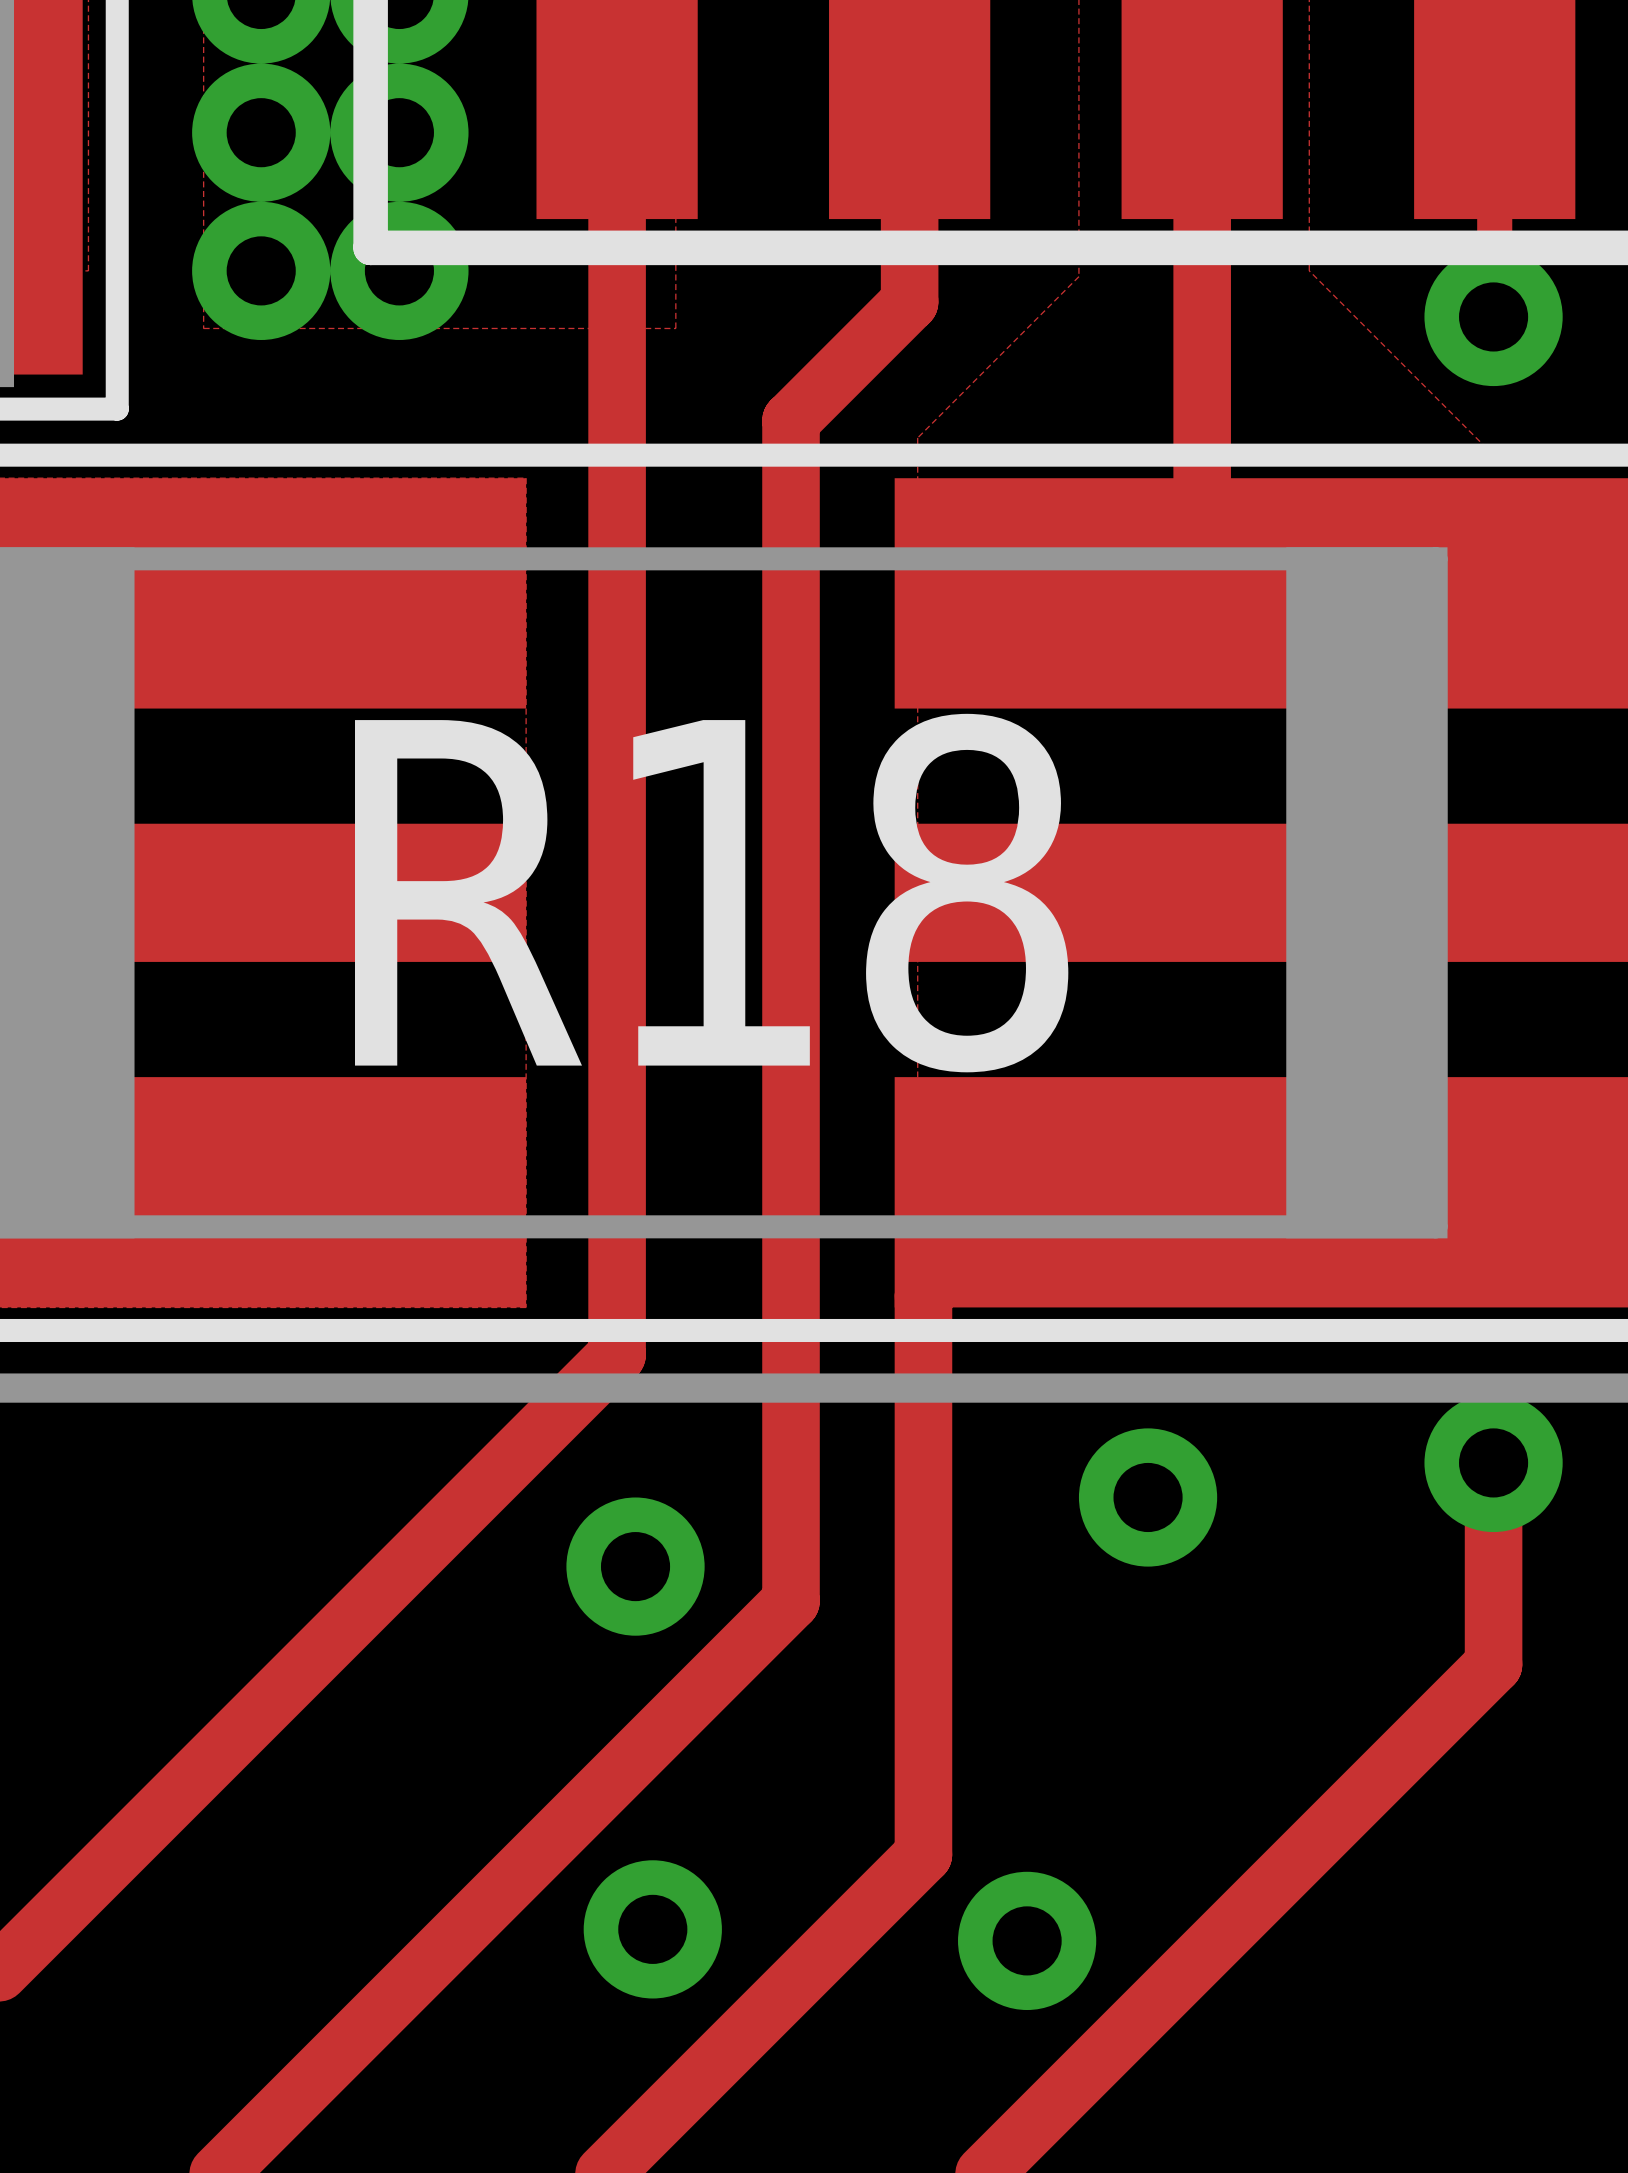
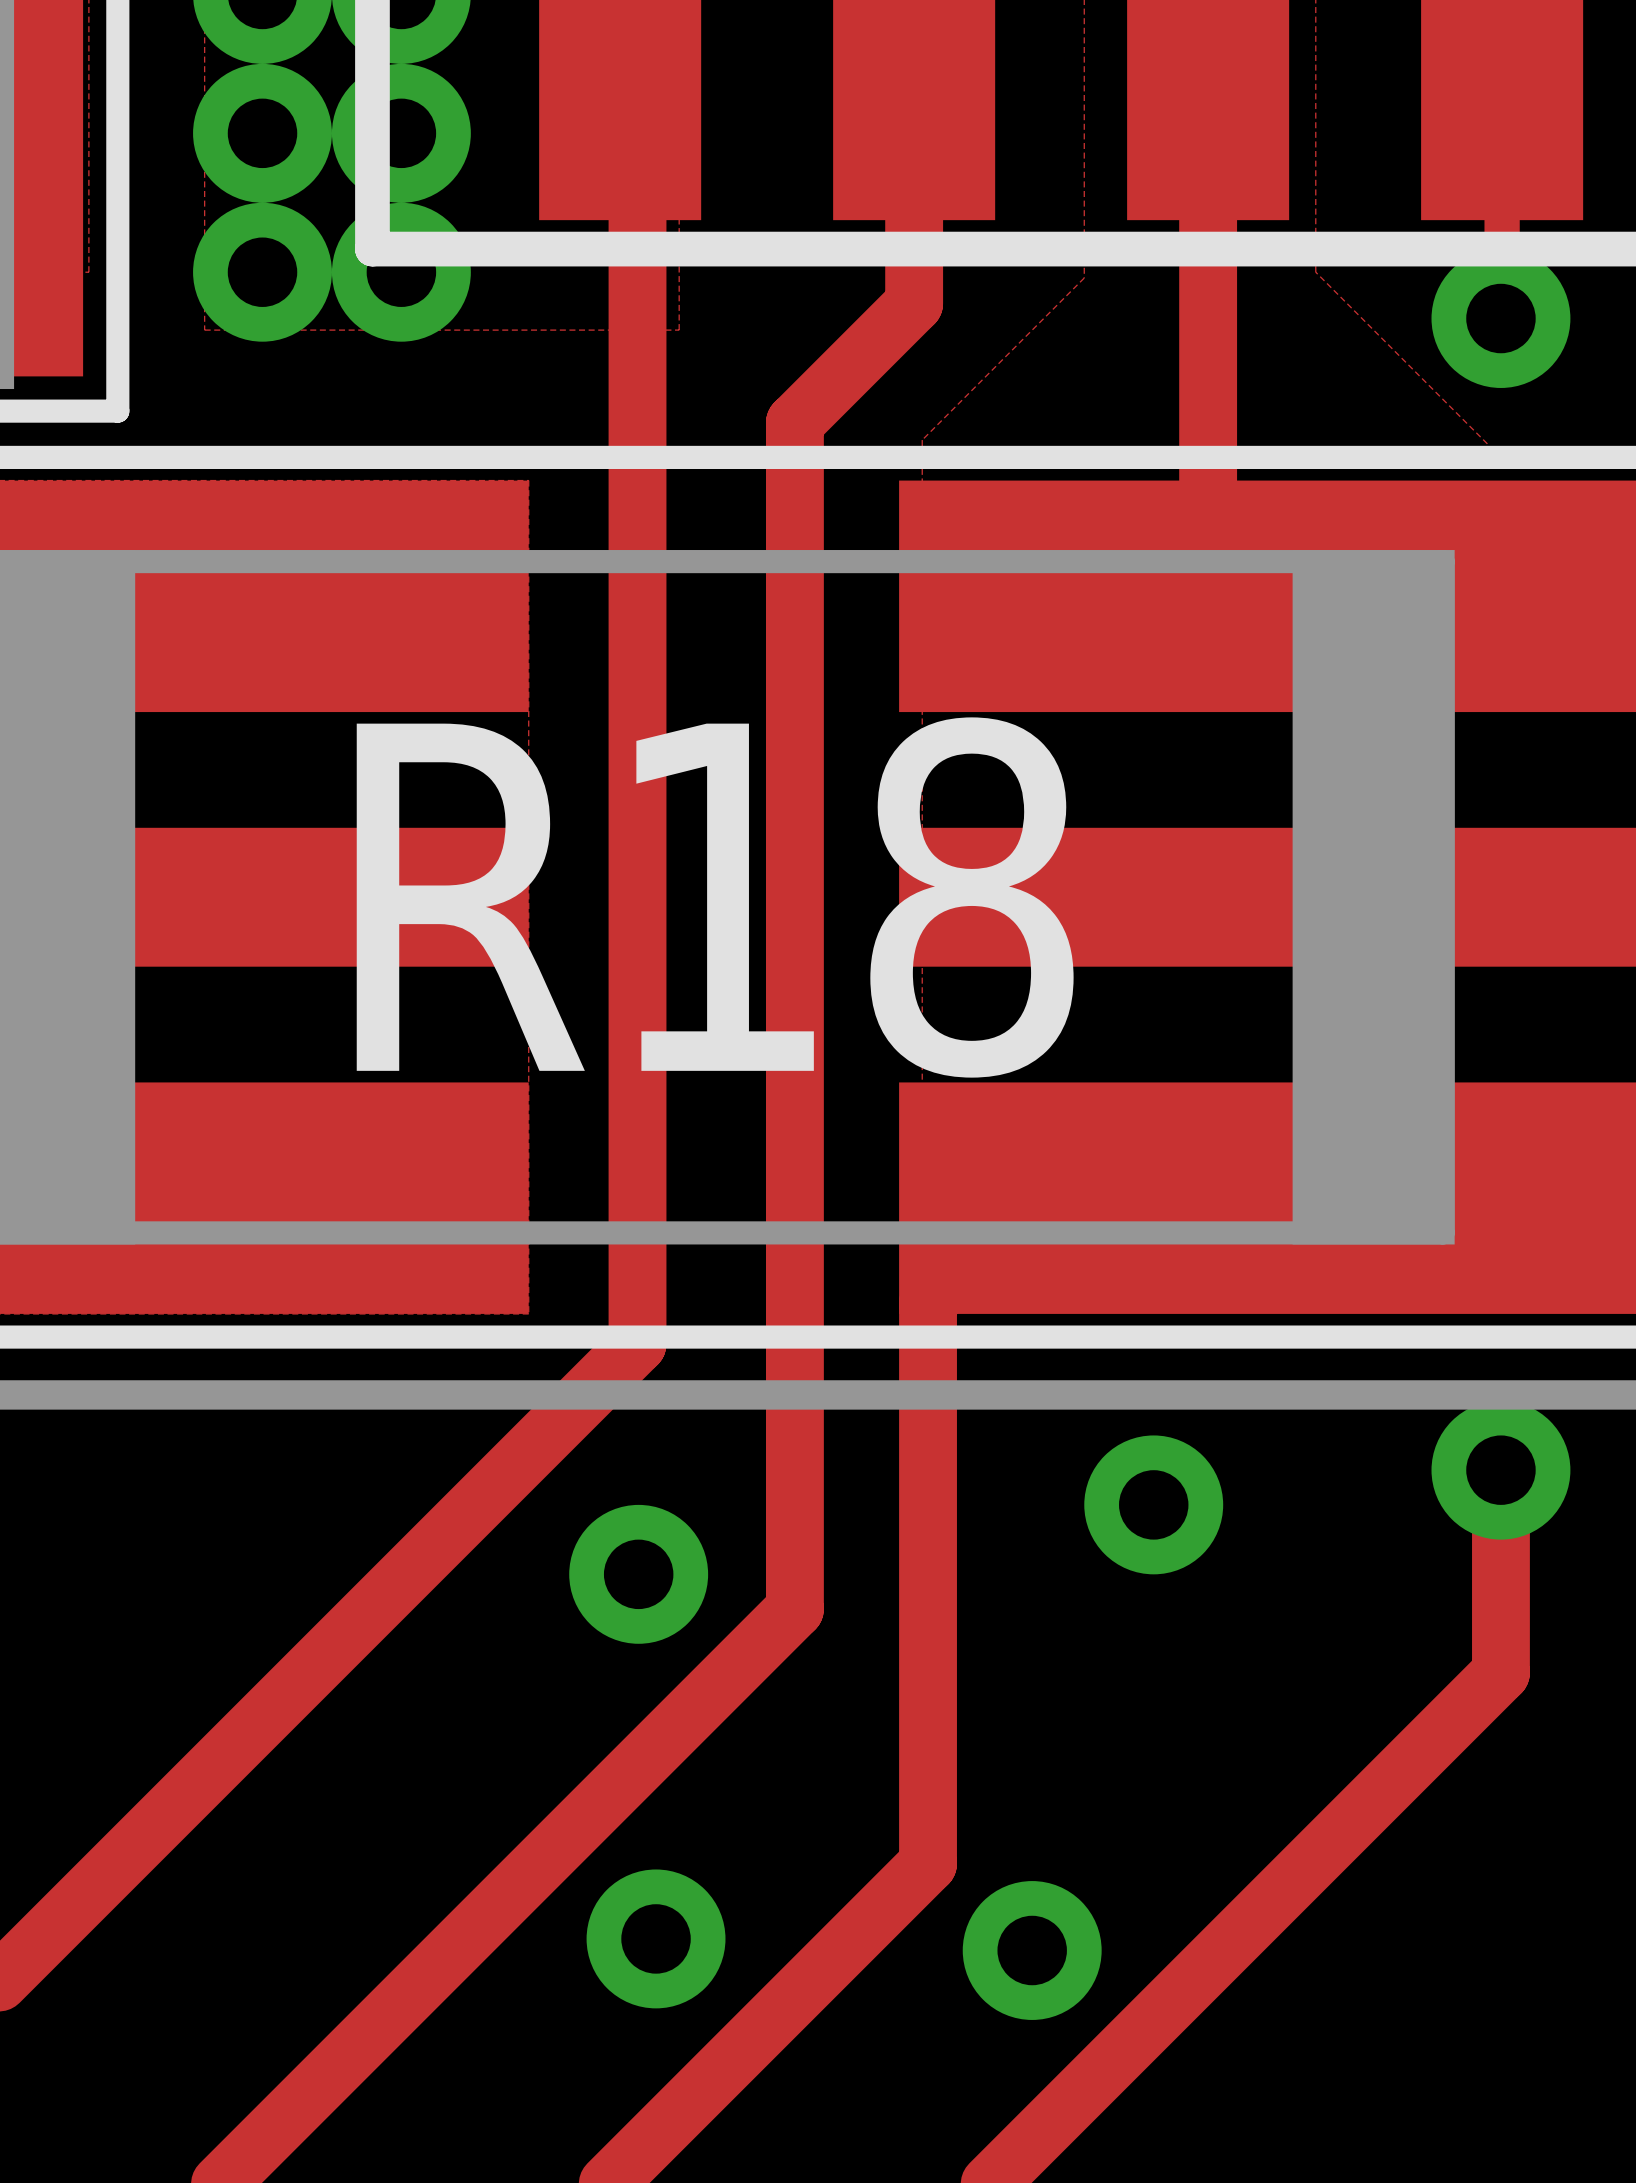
track: (617, 86) (617, 1354) -> (620, 87) (637, 104) (637, 1344) (620, 1361)

